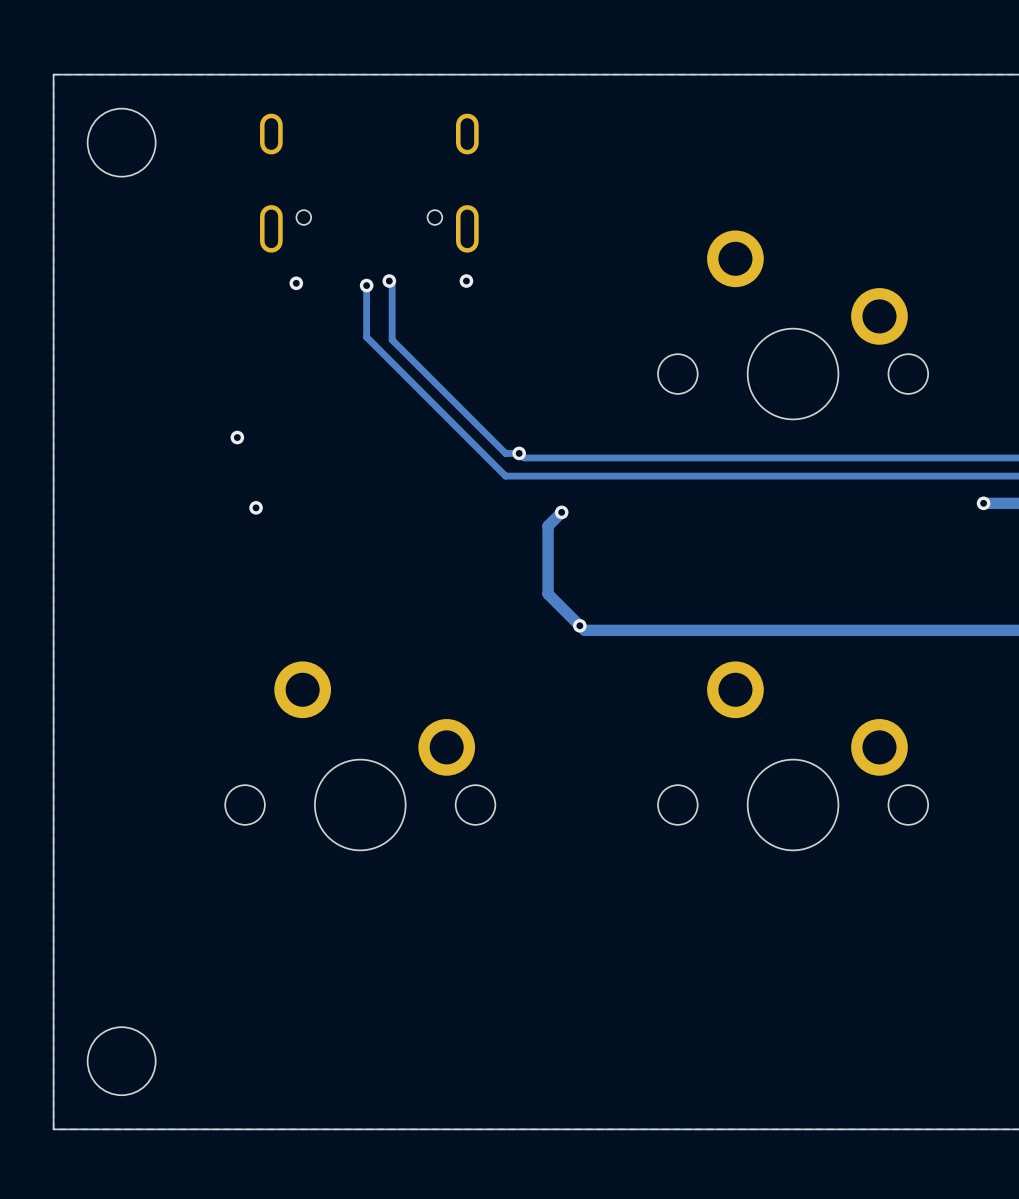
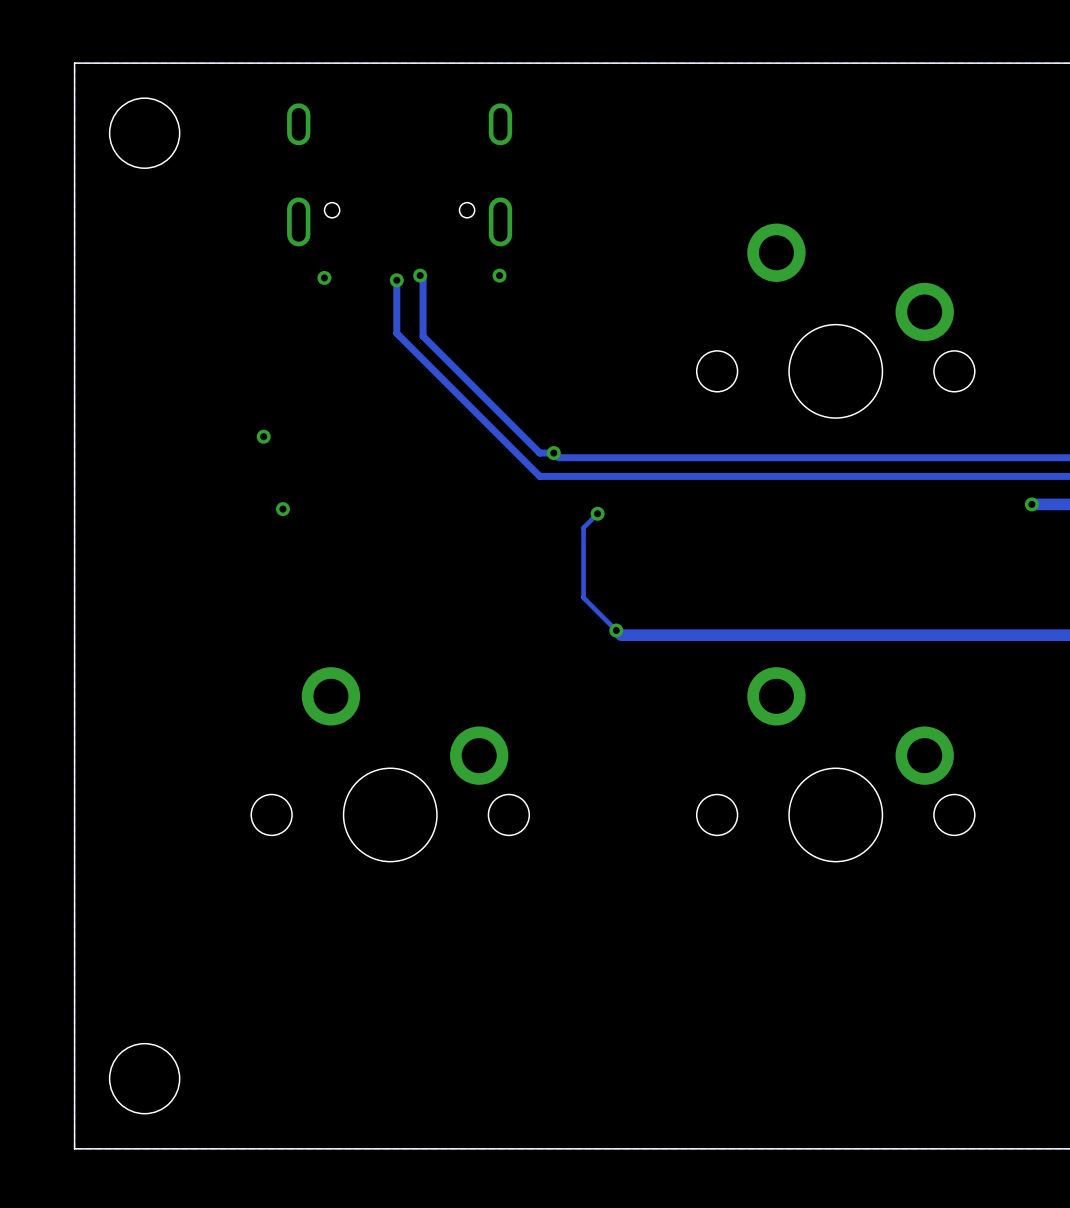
track width: thick (561, 512) (548, 526) (548, 594) (579, 625) -> thin (597, 513) (583, 527) (583, 597) (616, 630)

